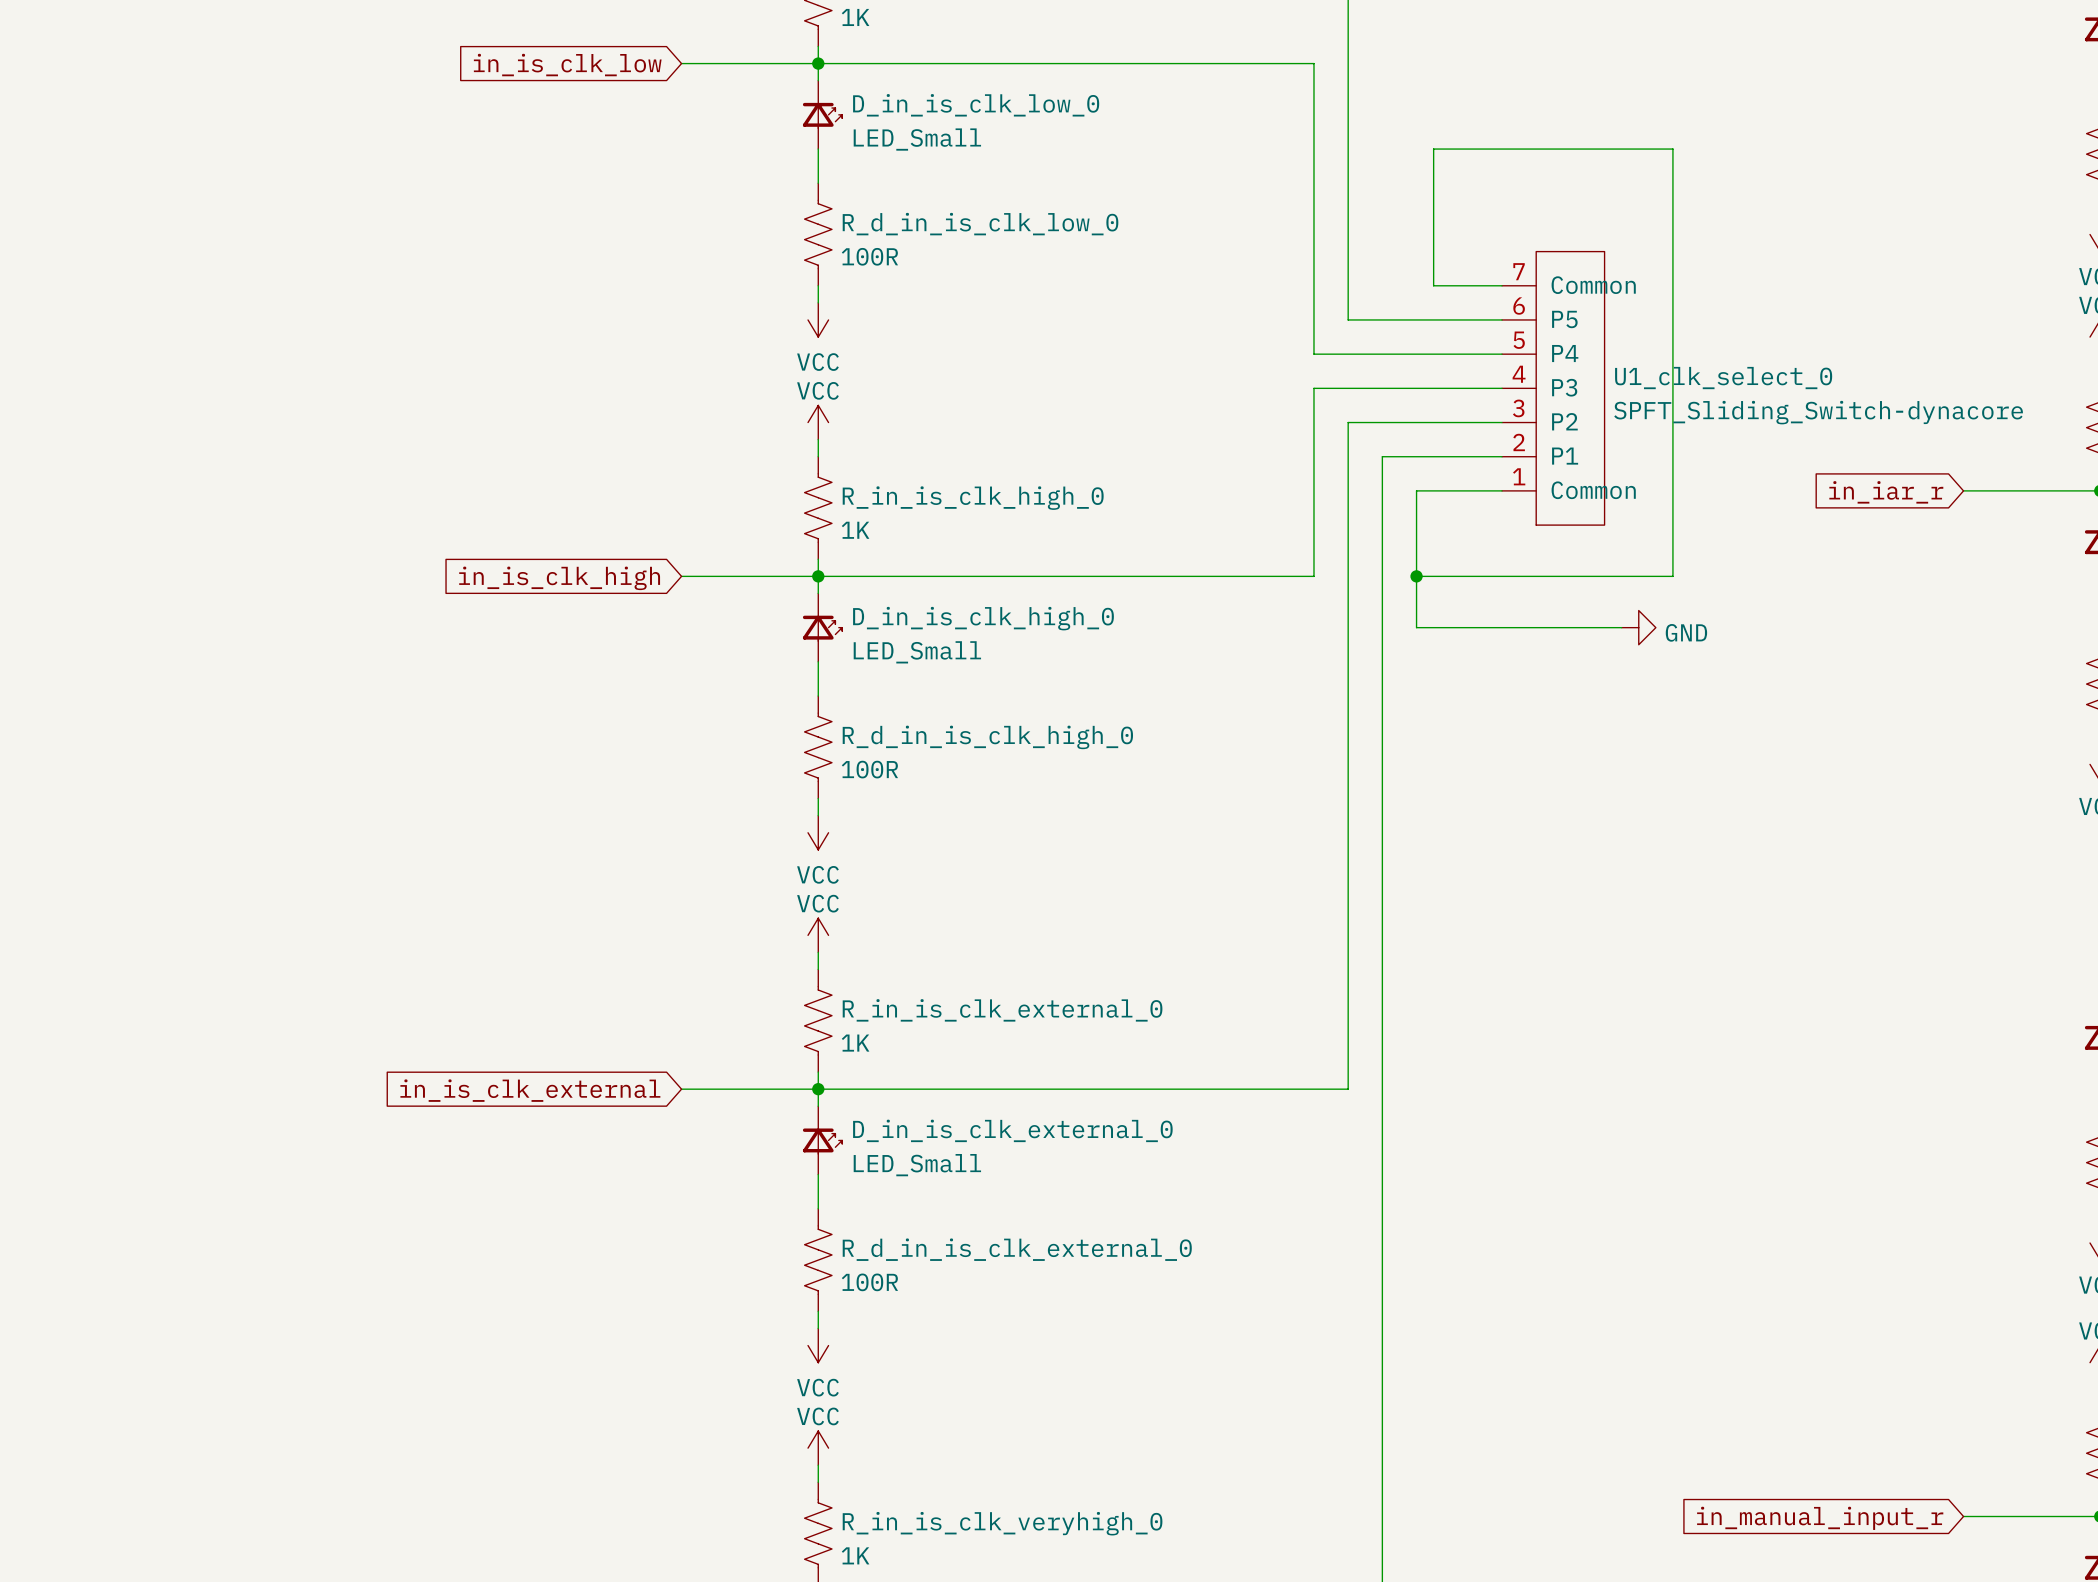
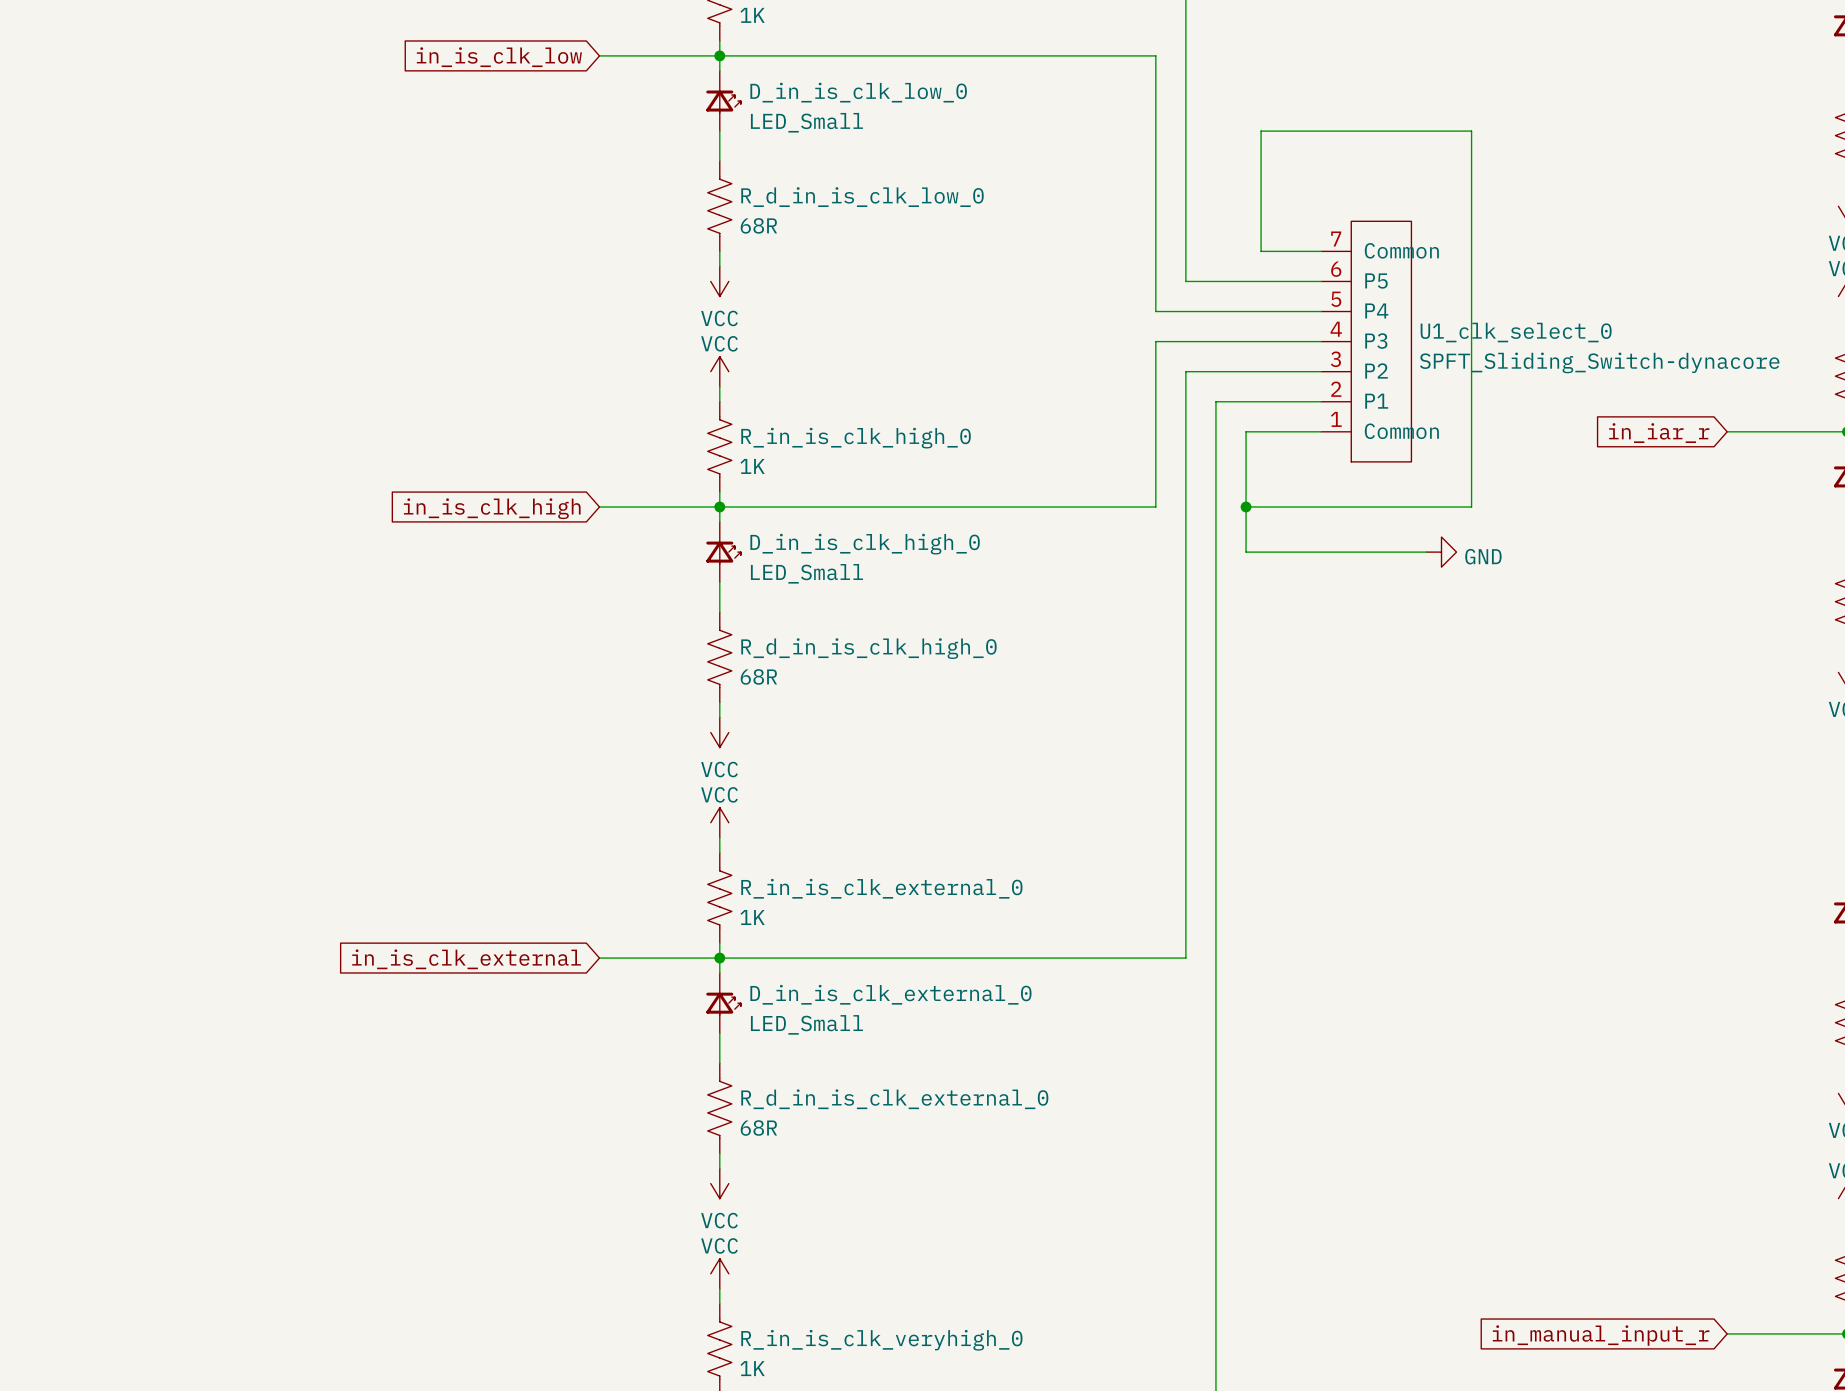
R_d_in_is_clk_low_0 value: 100R (869, 256) -> 68R (758, 225)
R_d_in_is_clk_high_0 value: 100R (869, 769) -> 68R (758, 676)
R_d_in_is_clk_external_0 value: 100R (869, 1282) -> 68R (758, 1128)

